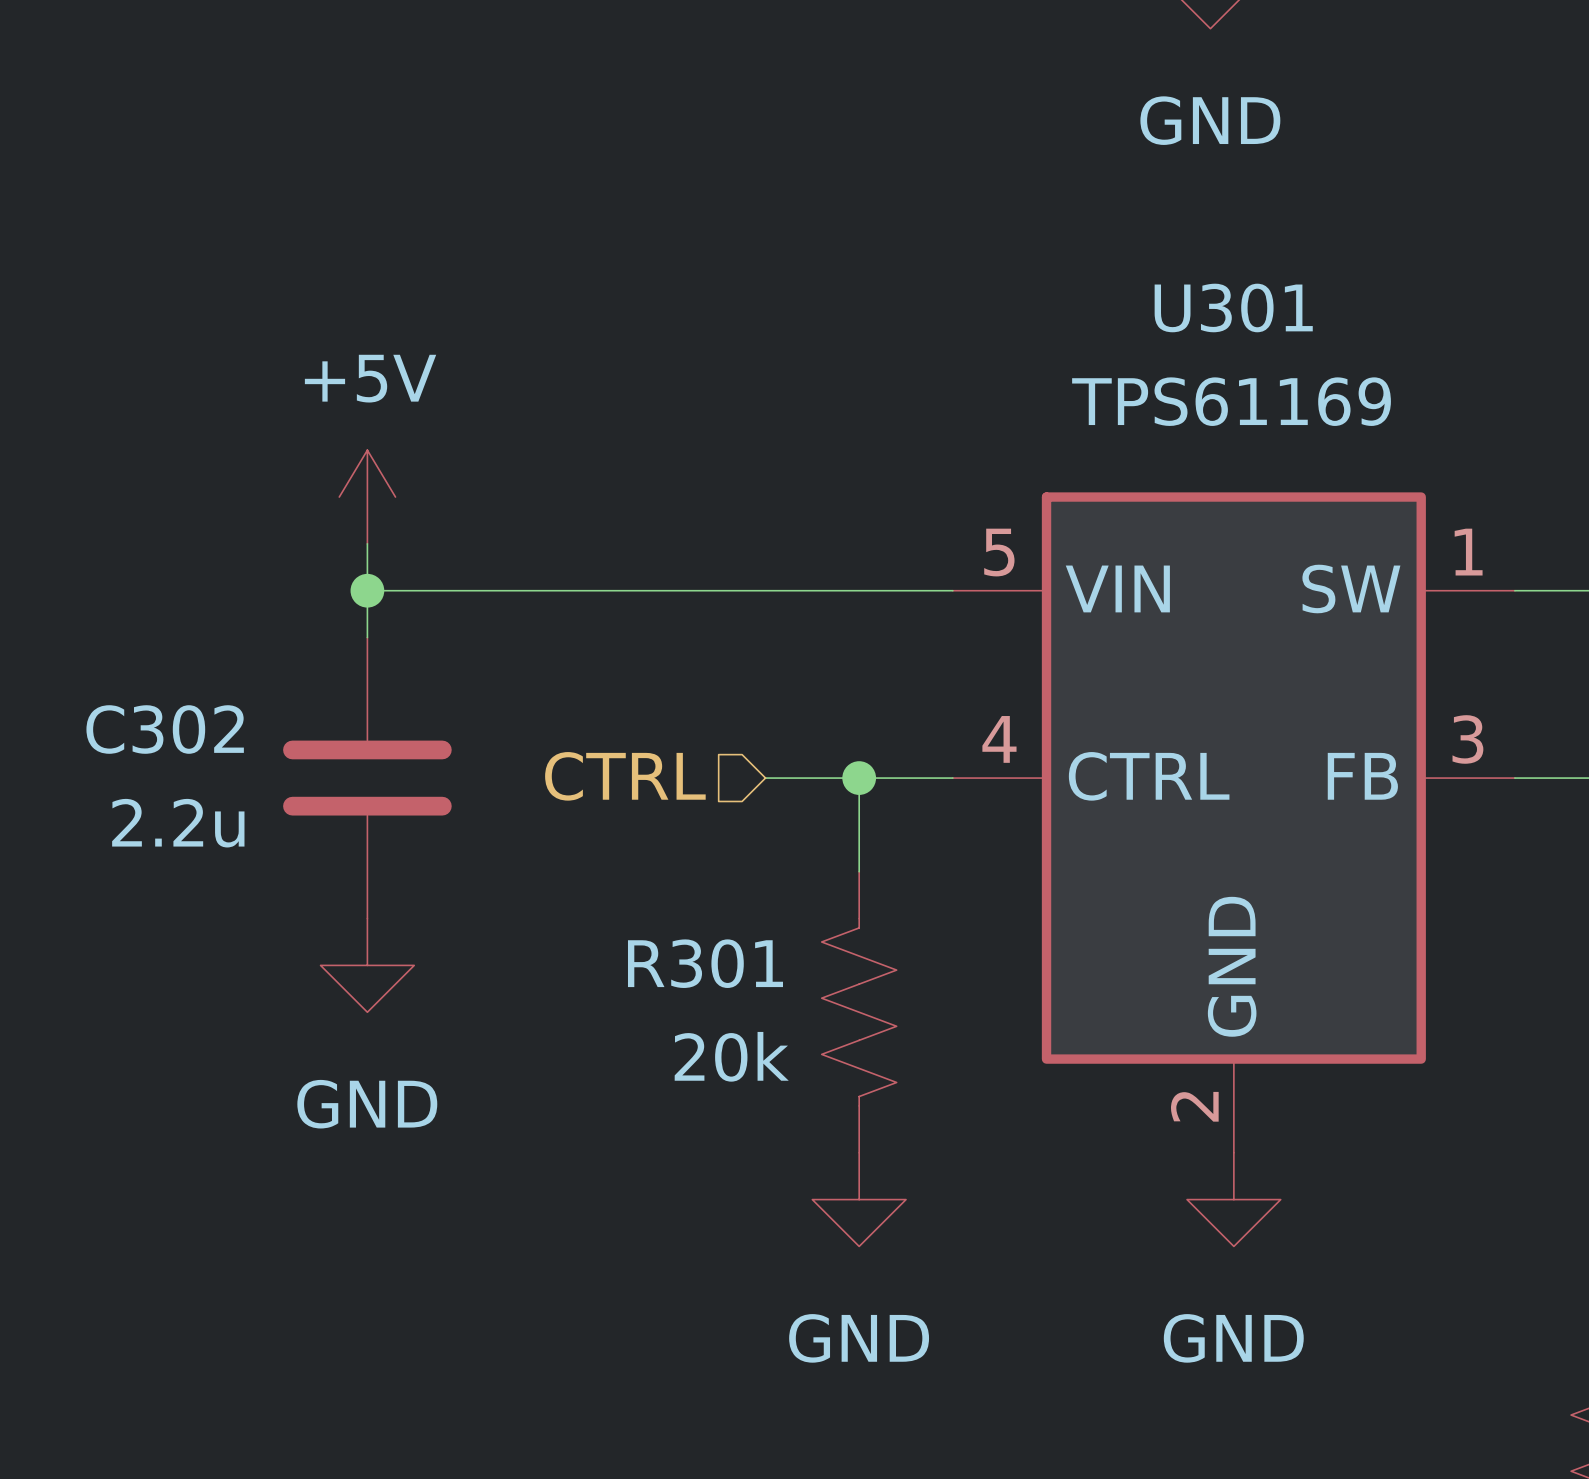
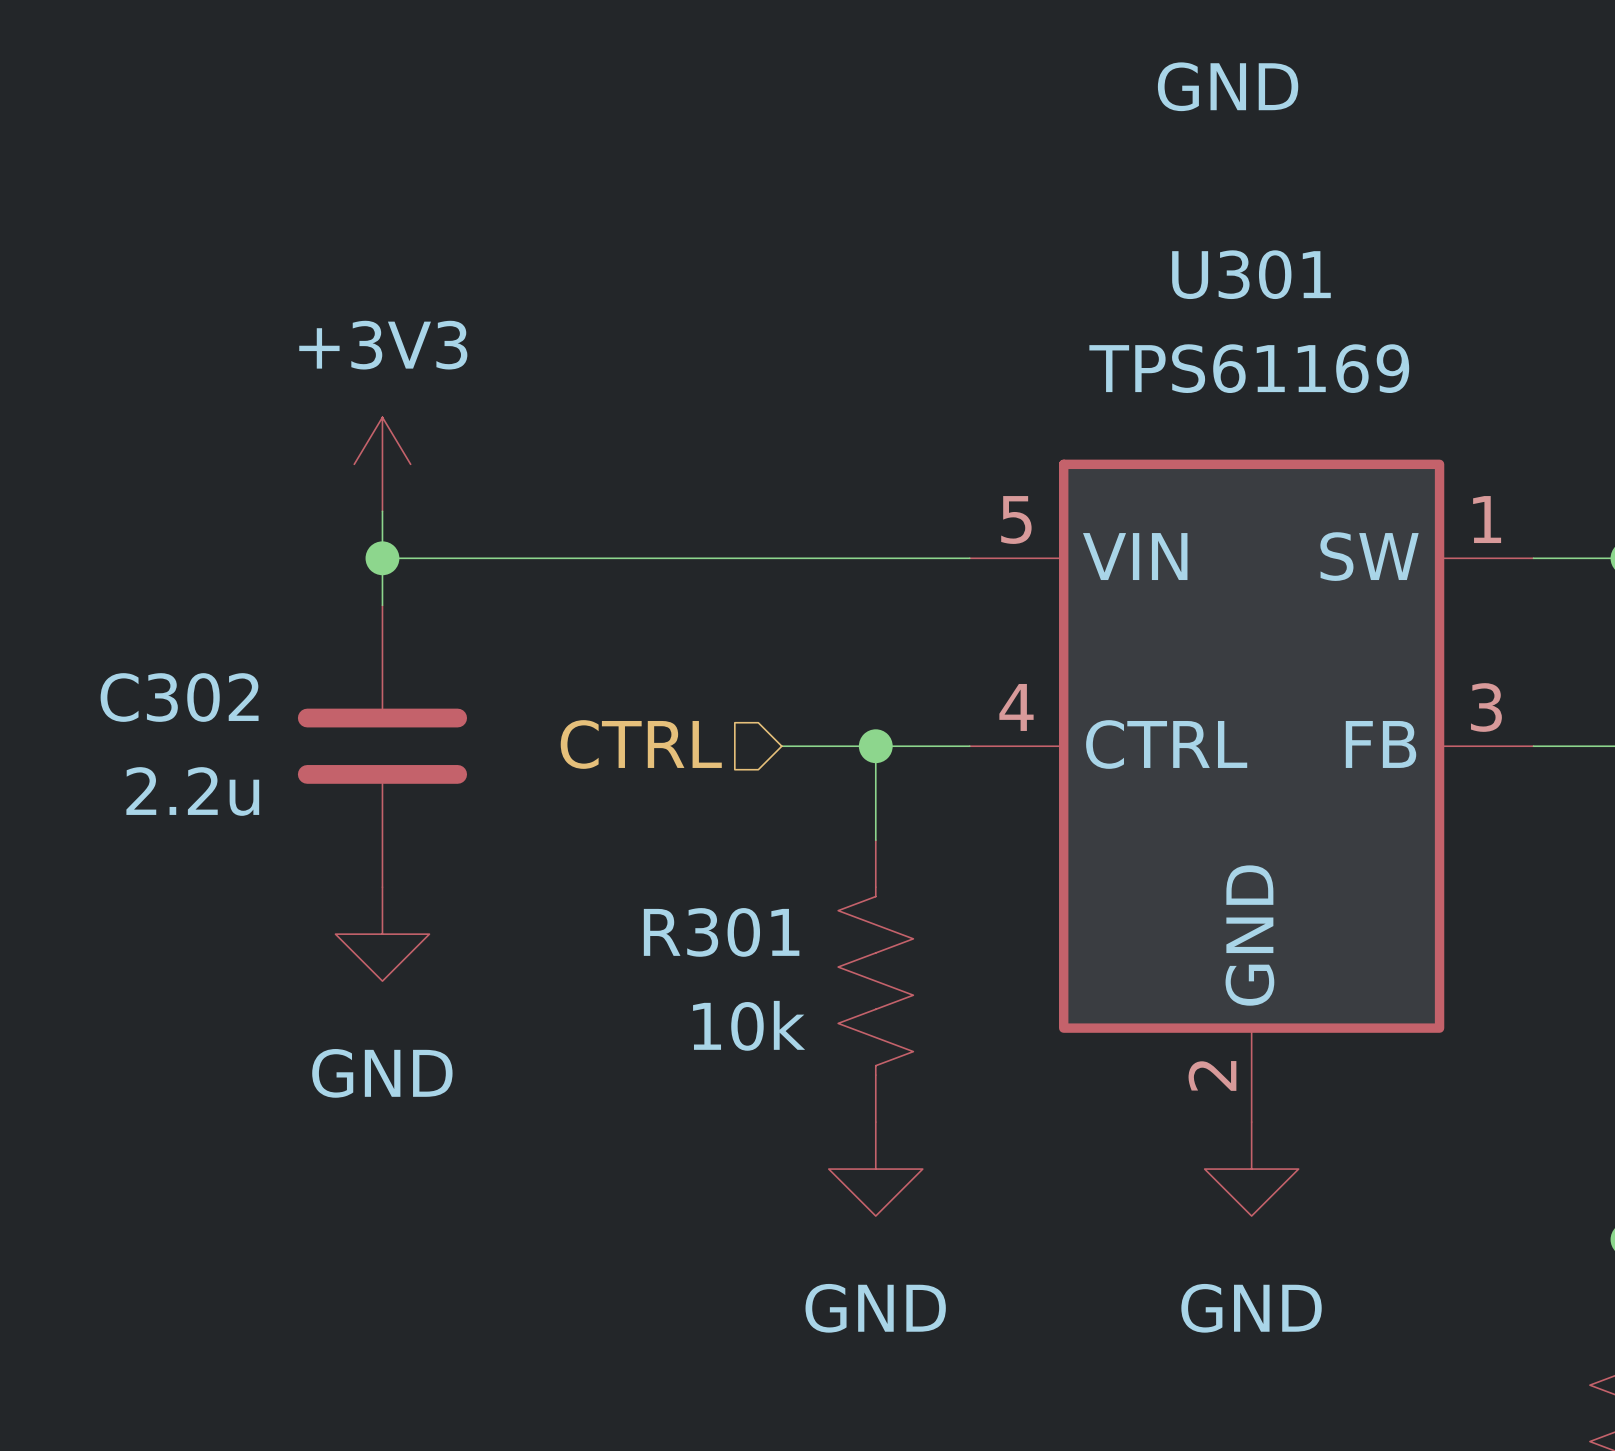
power symbol: +5V (367, 497) -> +3V3 (382, 464)
R301 value: 20k (731, 1056) -> 10k (749, 1025)

